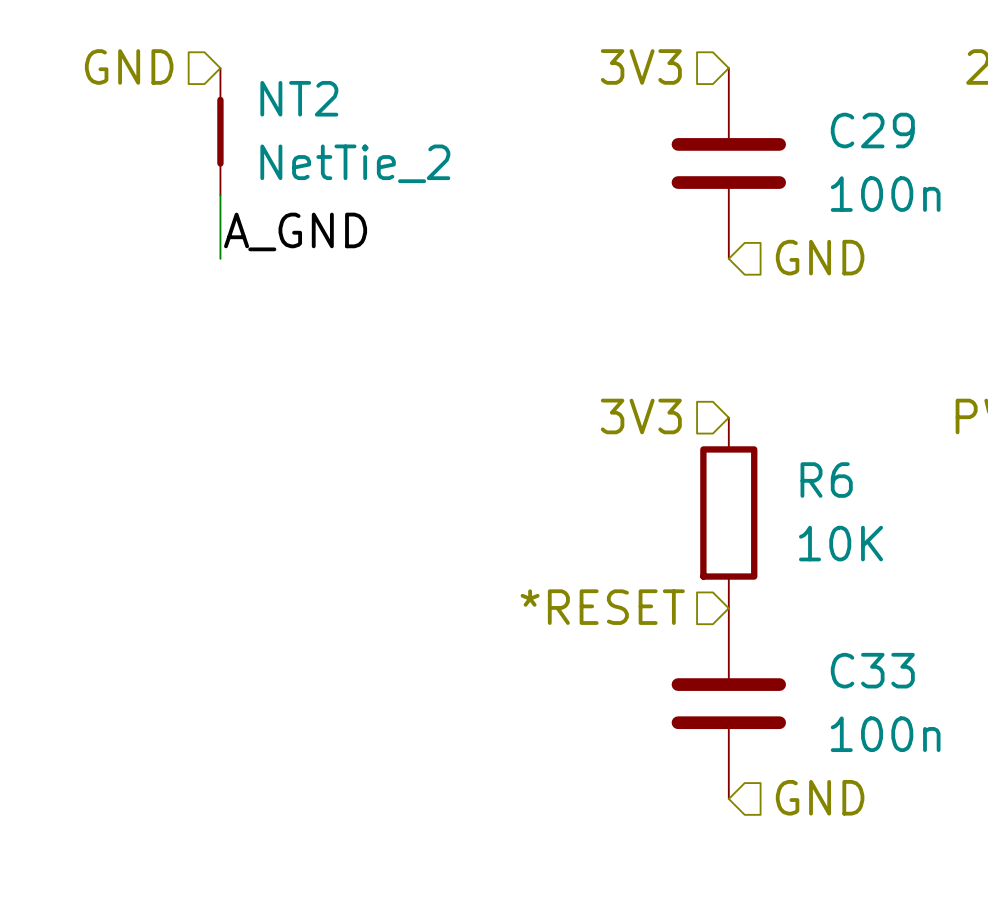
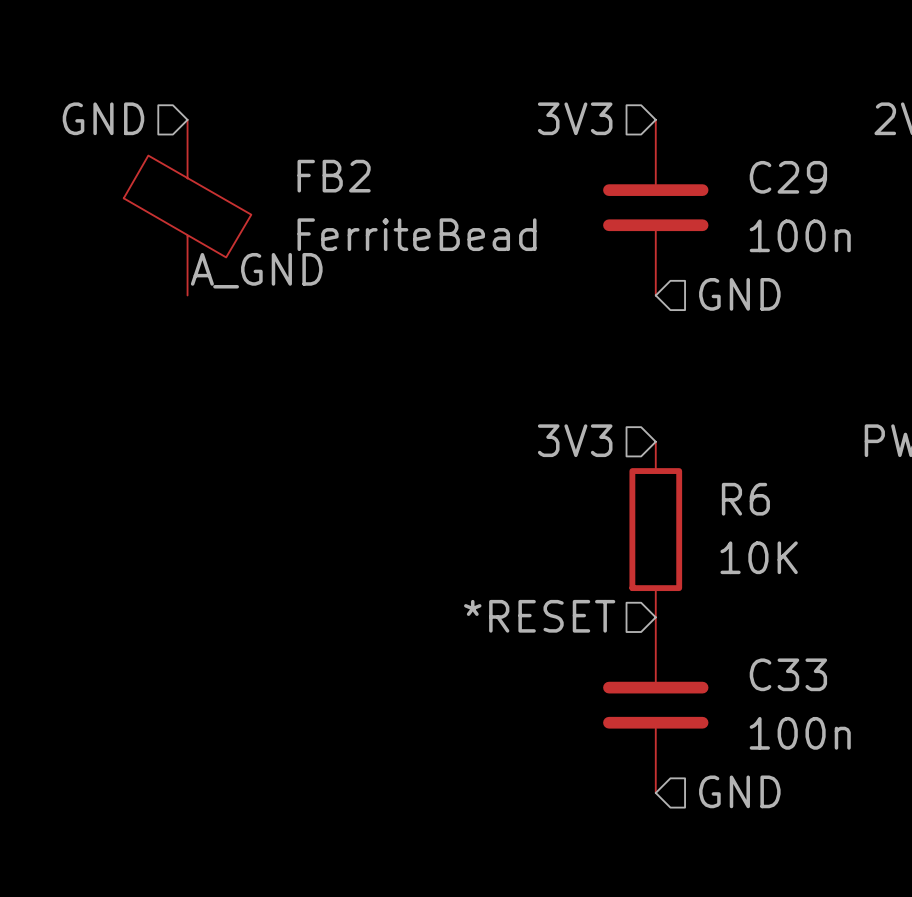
NT2: NetTie_2 (220, 131) -> none
FB2: none -> FerriteBead (187, 207)

